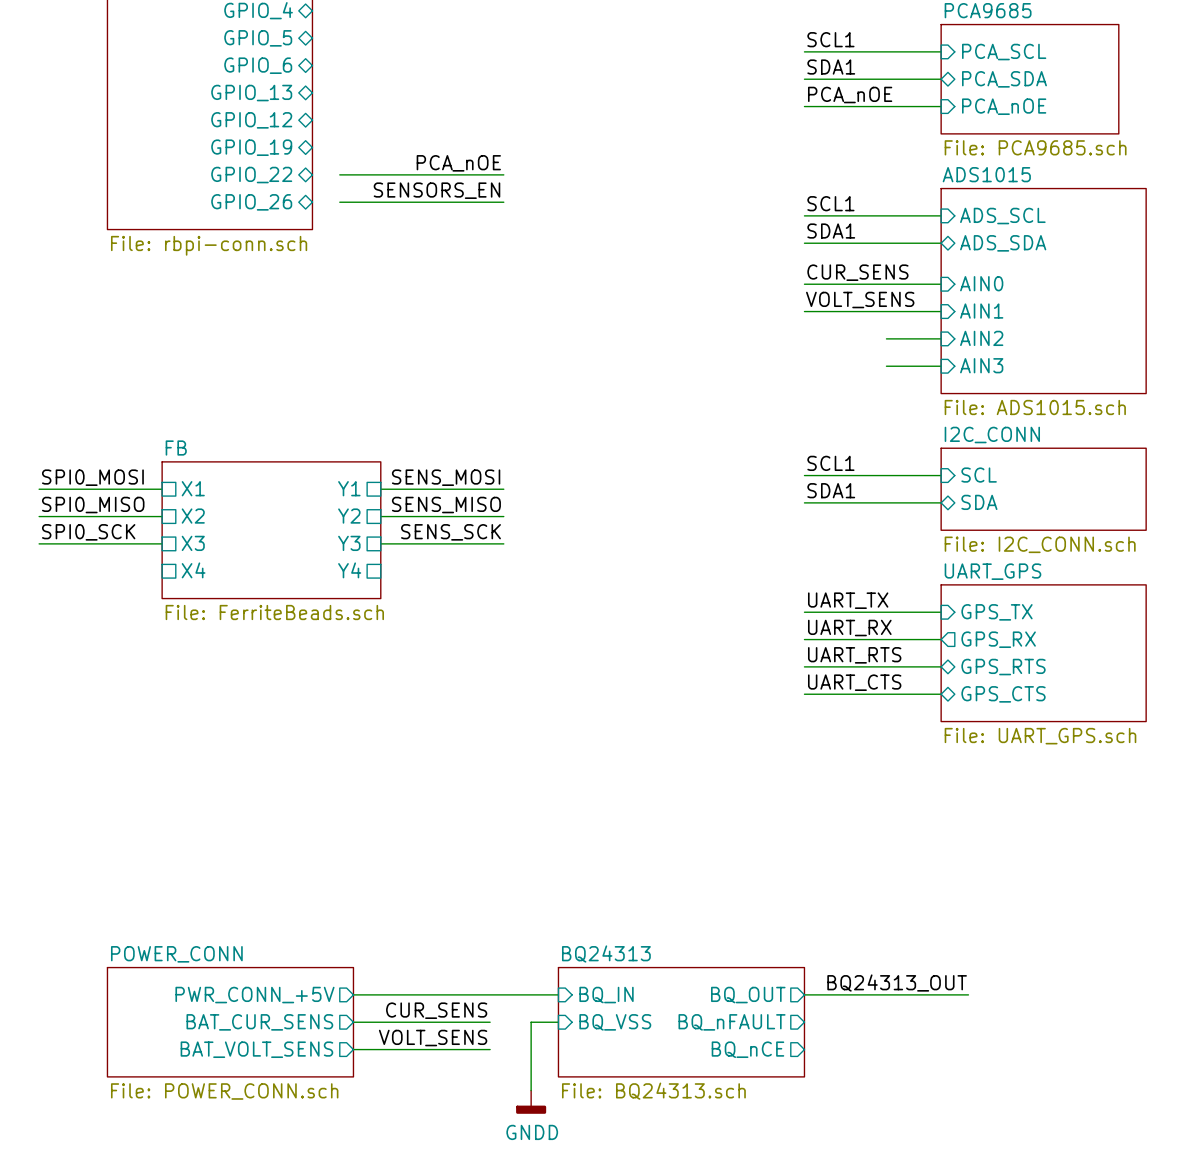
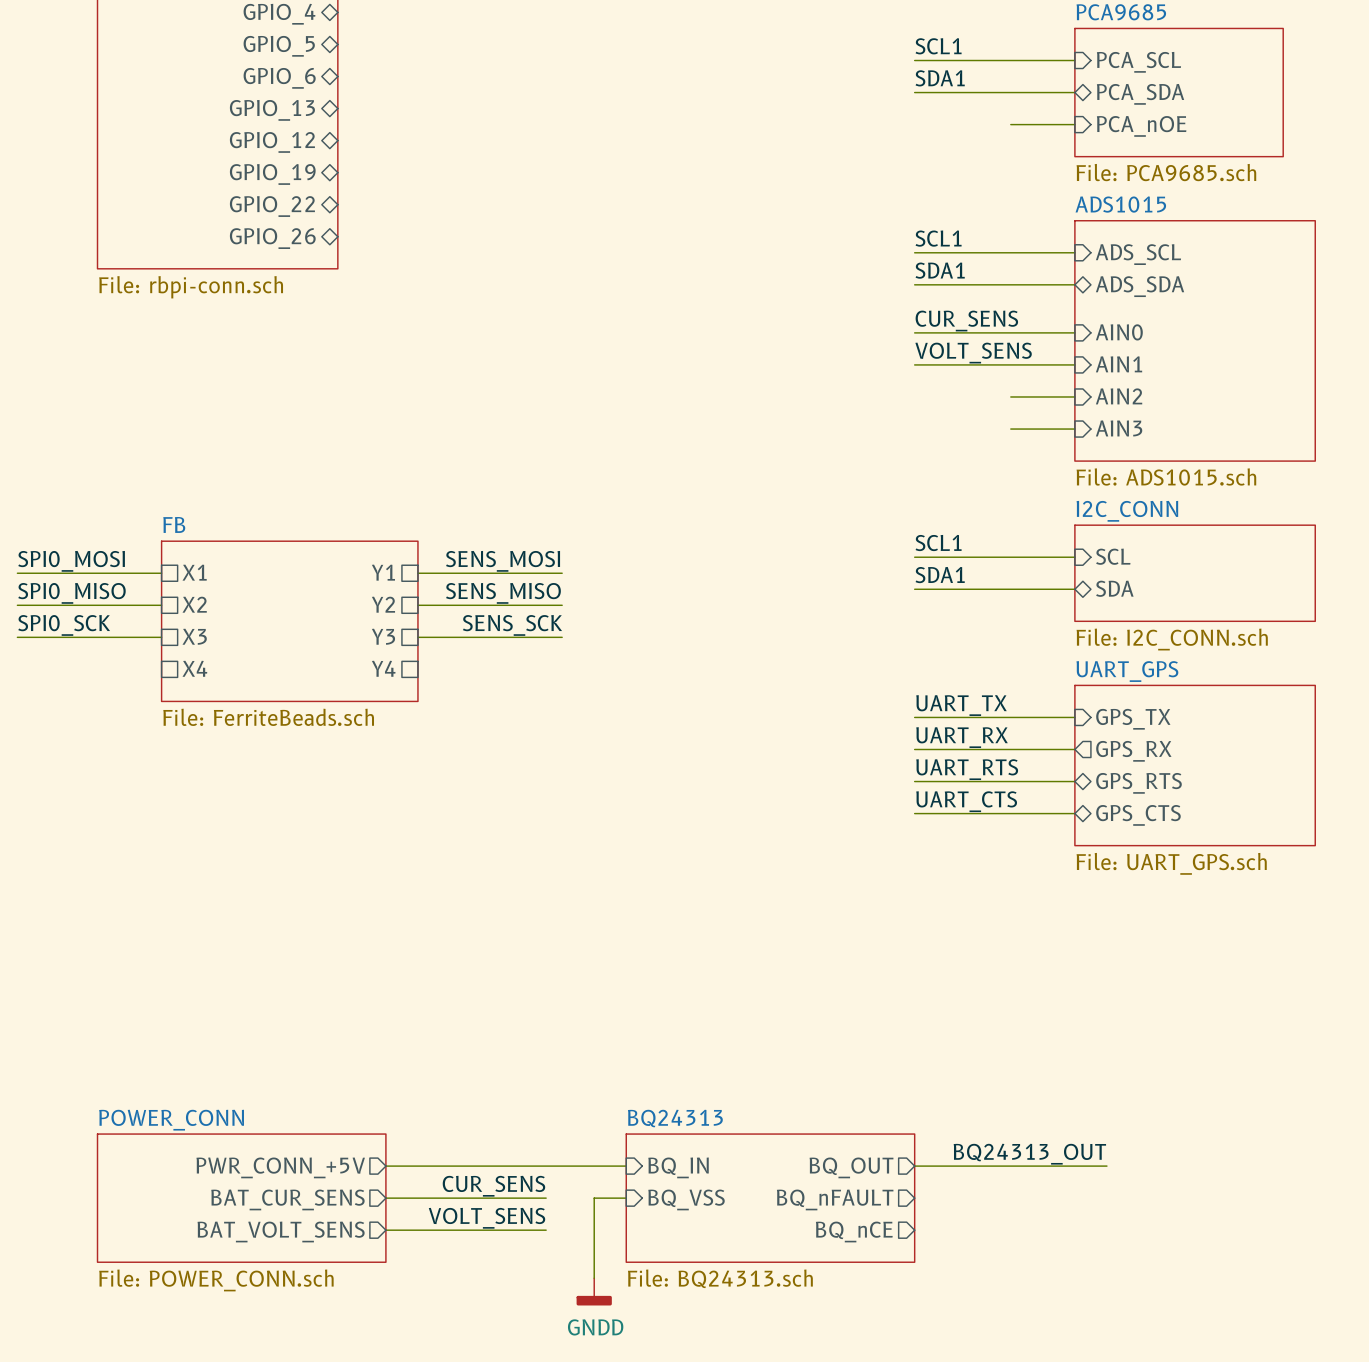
label: PCA_nOE (850, 95) -> none
wire: (804, 106) (886, 106) -> none
label: PCA_nOE (458, 163) -> none
wire: (339, 174) (503, 174) -> none
label: SENSORS_EN (436, 190) -> none
wire: (339, 202) (503, 202) -> none

